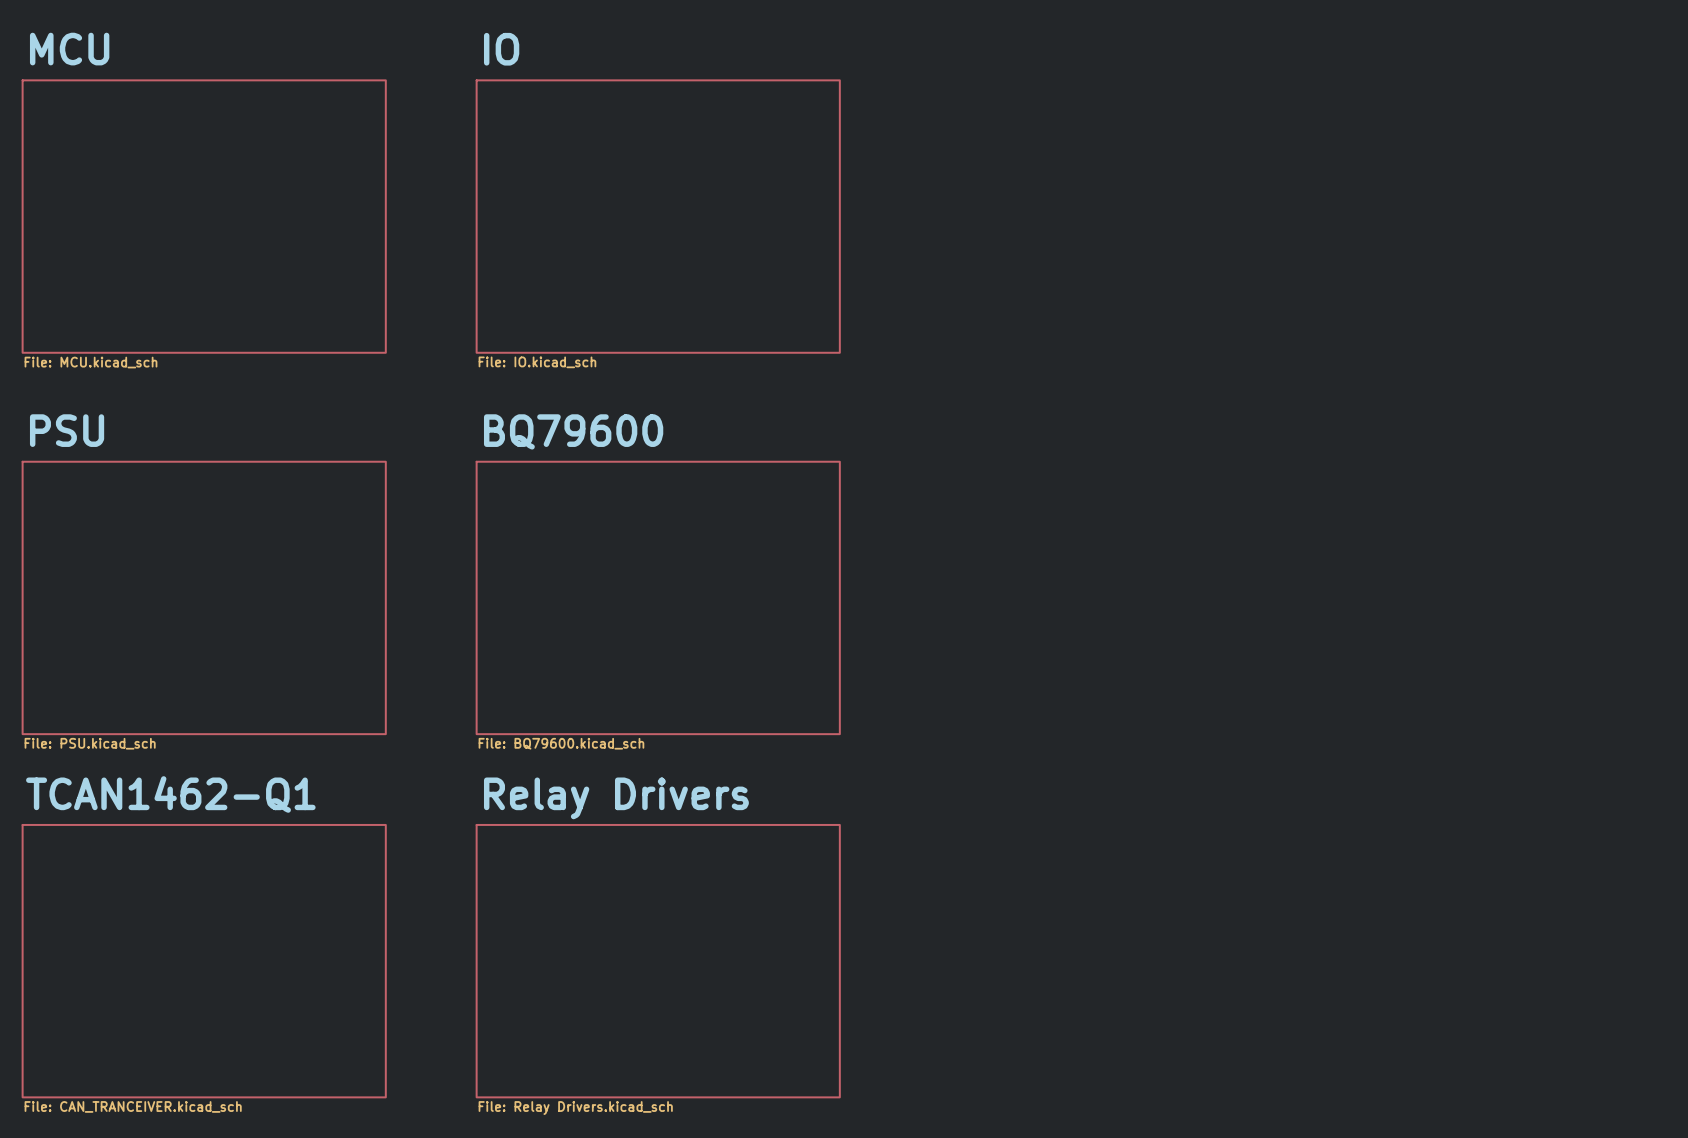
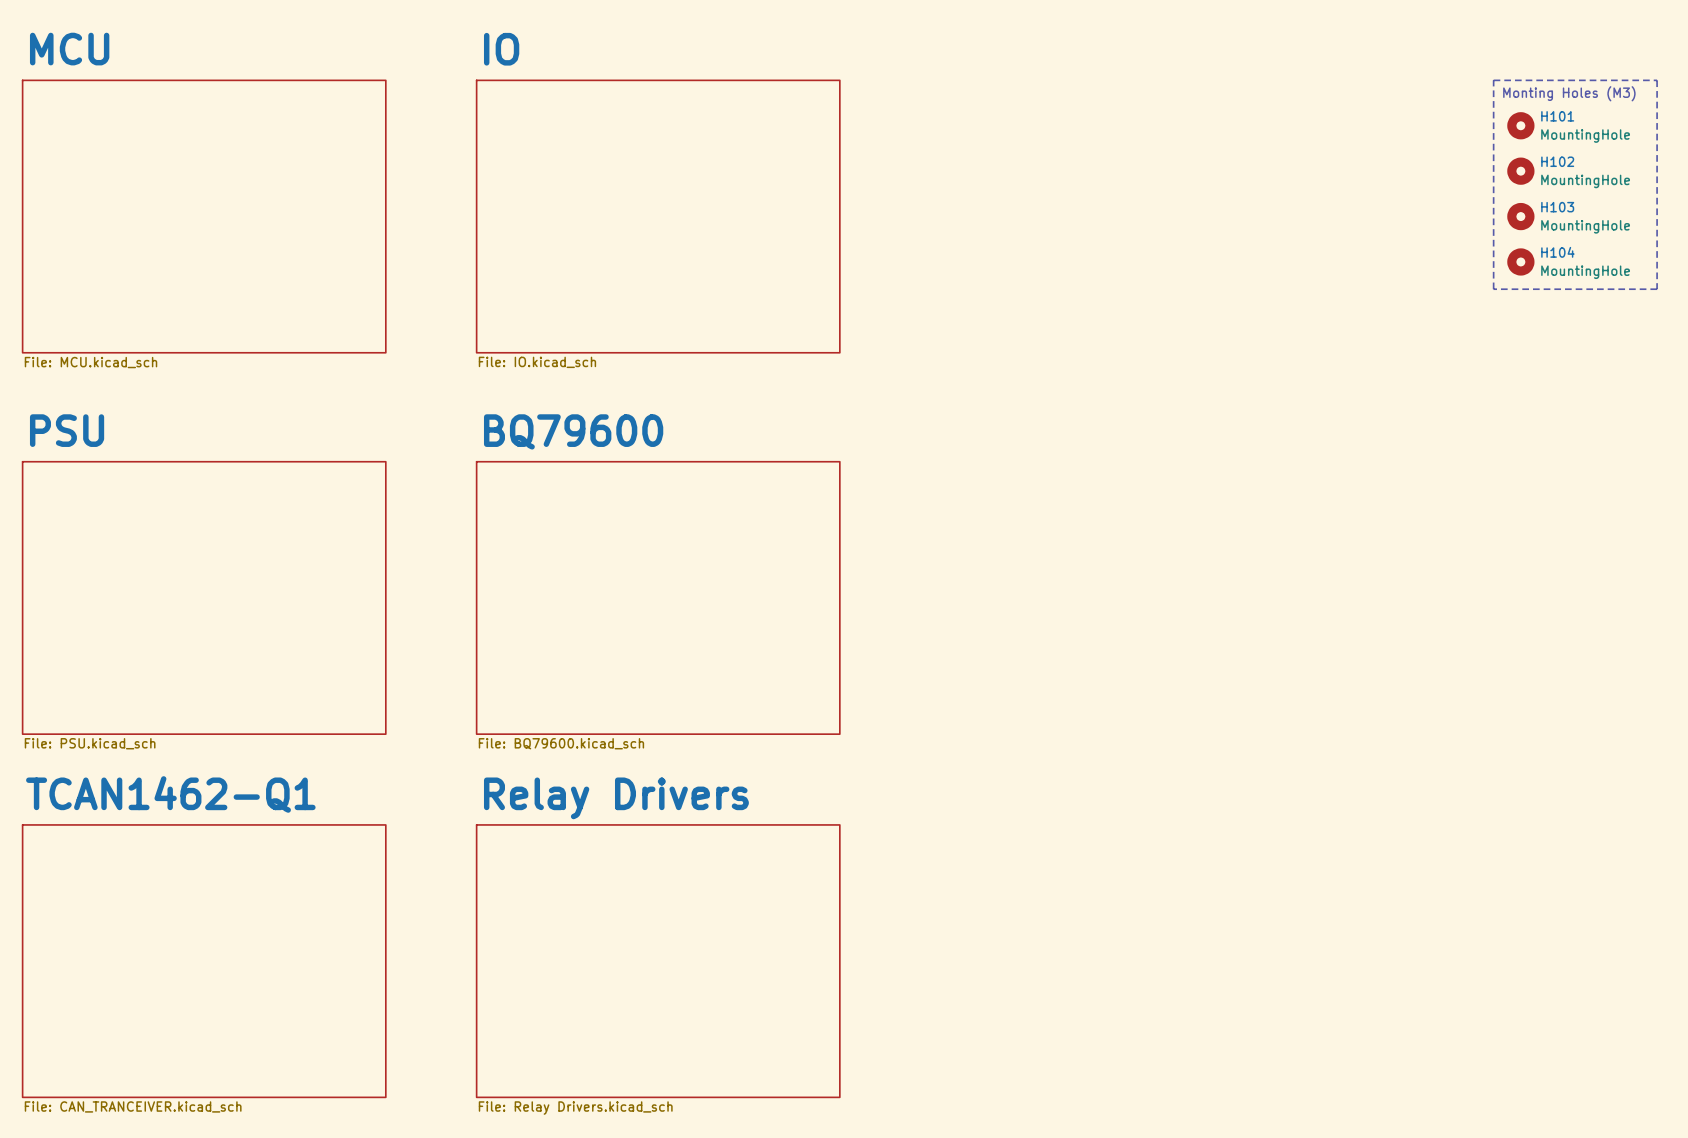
line: none -> (1493, 80) (1657, 80) (1657, 289) (1493, 289) (1493, 80)
text: none -> Monting Holes (M3) (1569, 93)
H101: none -> MountingHole (1520, 125)
H102: none -> MountingHole (1520, 171)
H103: none -> MountingHole (1520, 216)
H104: none -> MountingHole (1520, 261)

